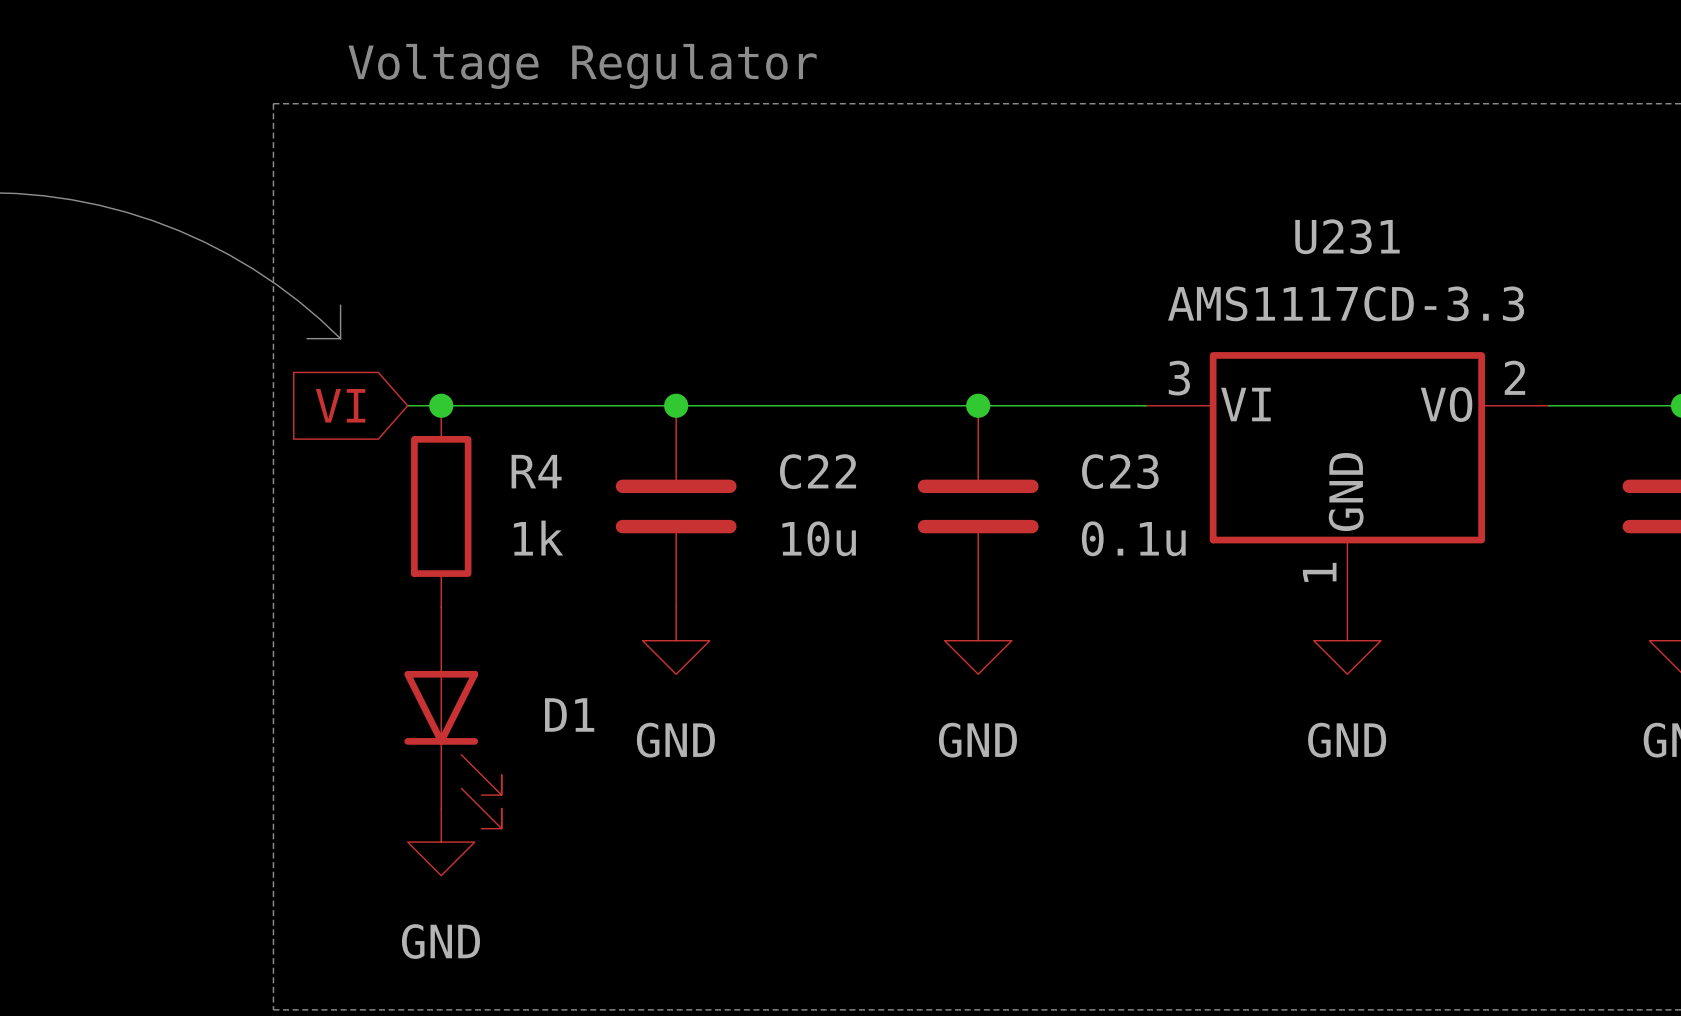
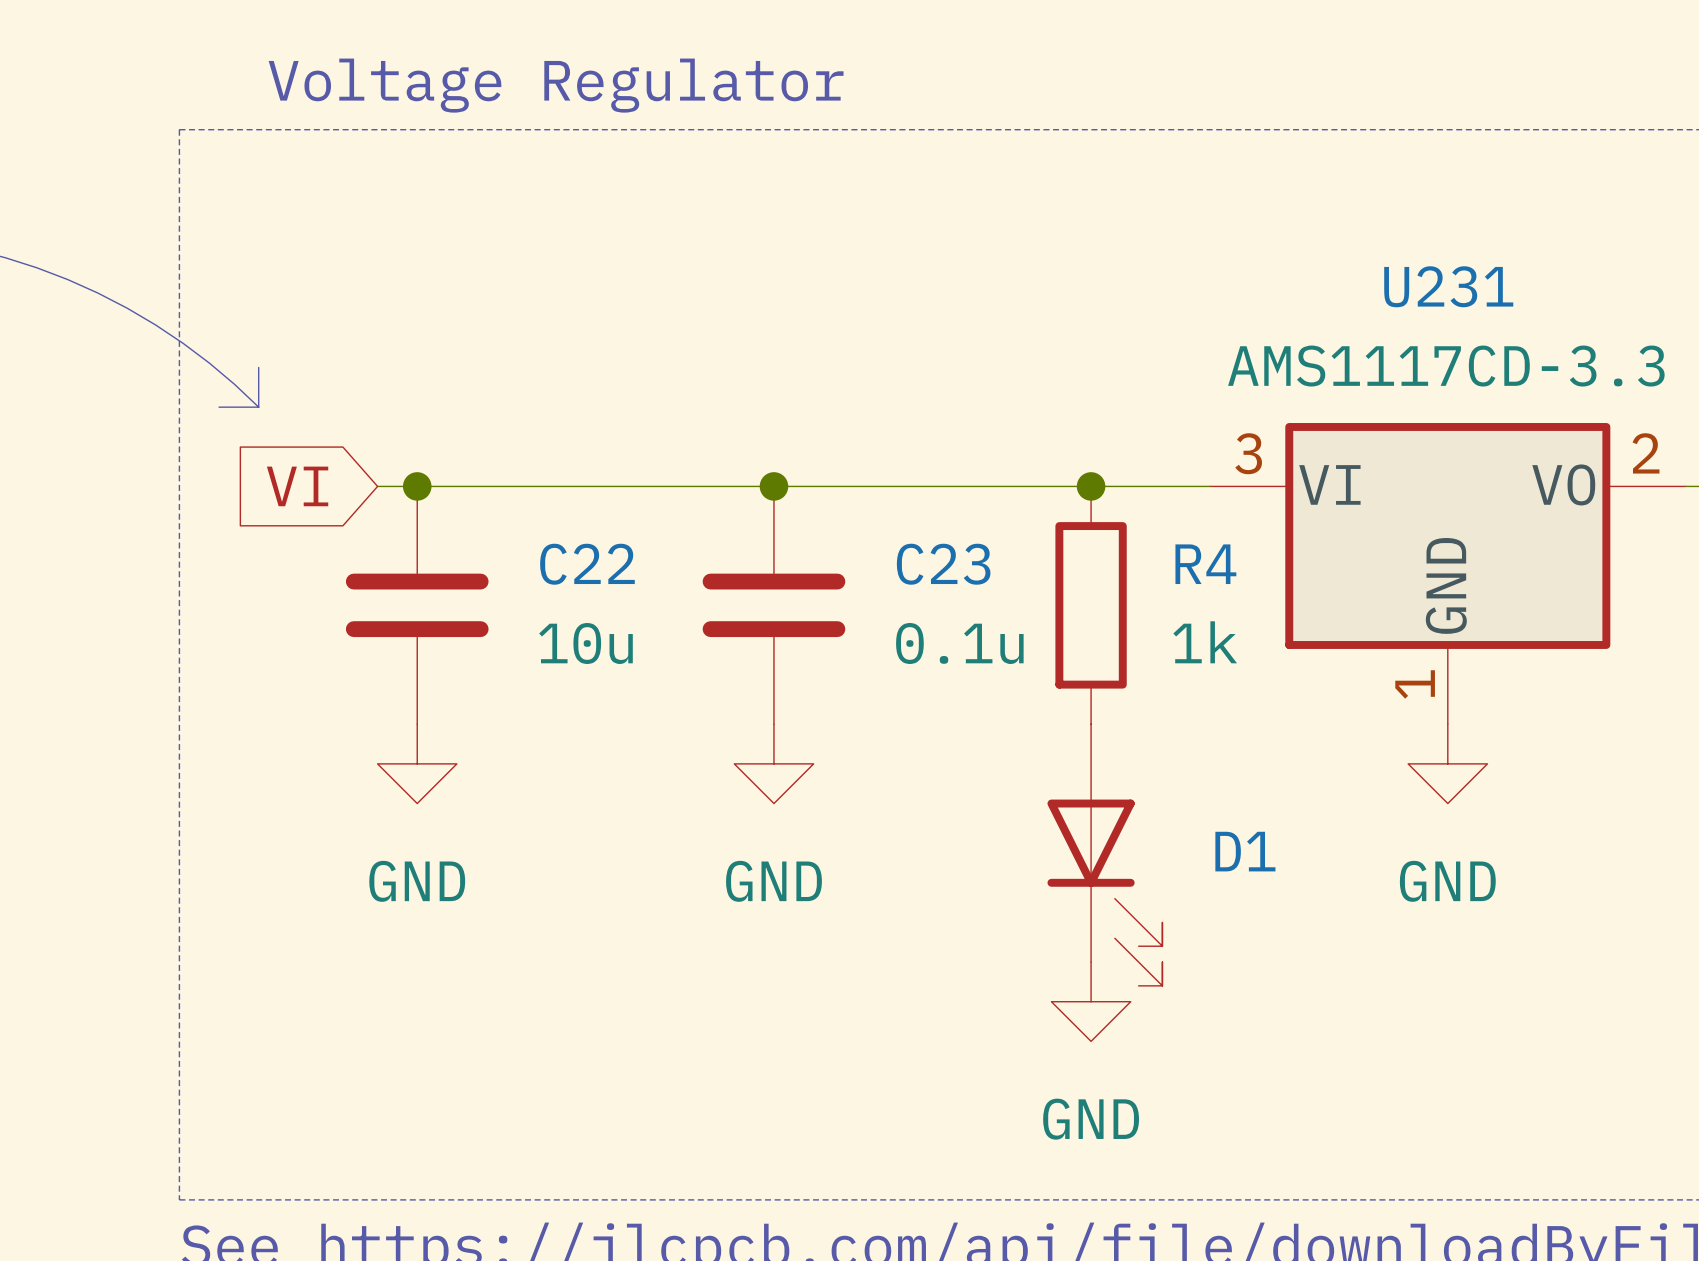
global label position: VI (340, 405) -> VI (297, 486)
wire: (407, 405) (441, 405) -> none
junction position: (441, 405) -> (417, 486)
junction: (676, 405) -> none
junction: none -> (773, 486)
junction position: (978, 405) -> (1091, 486)
R4 position: (441, 506) -> (1091, 605)
C22 position: (676, 506) -> (417, 605)
C23 position: (978, 506) -> (773, 605)
power symbol: none -> GND (417, 763)
power symbol: GND (676, 640) -> none
power symbol: none -> GND (773, 763)
power symbol: GND (978, 640) -> none
D1 position: (452, 717) -> (1104, 855)
power symbol: GND (441, 842) -> none
power symbol: none -> GND (1091, 1001)

